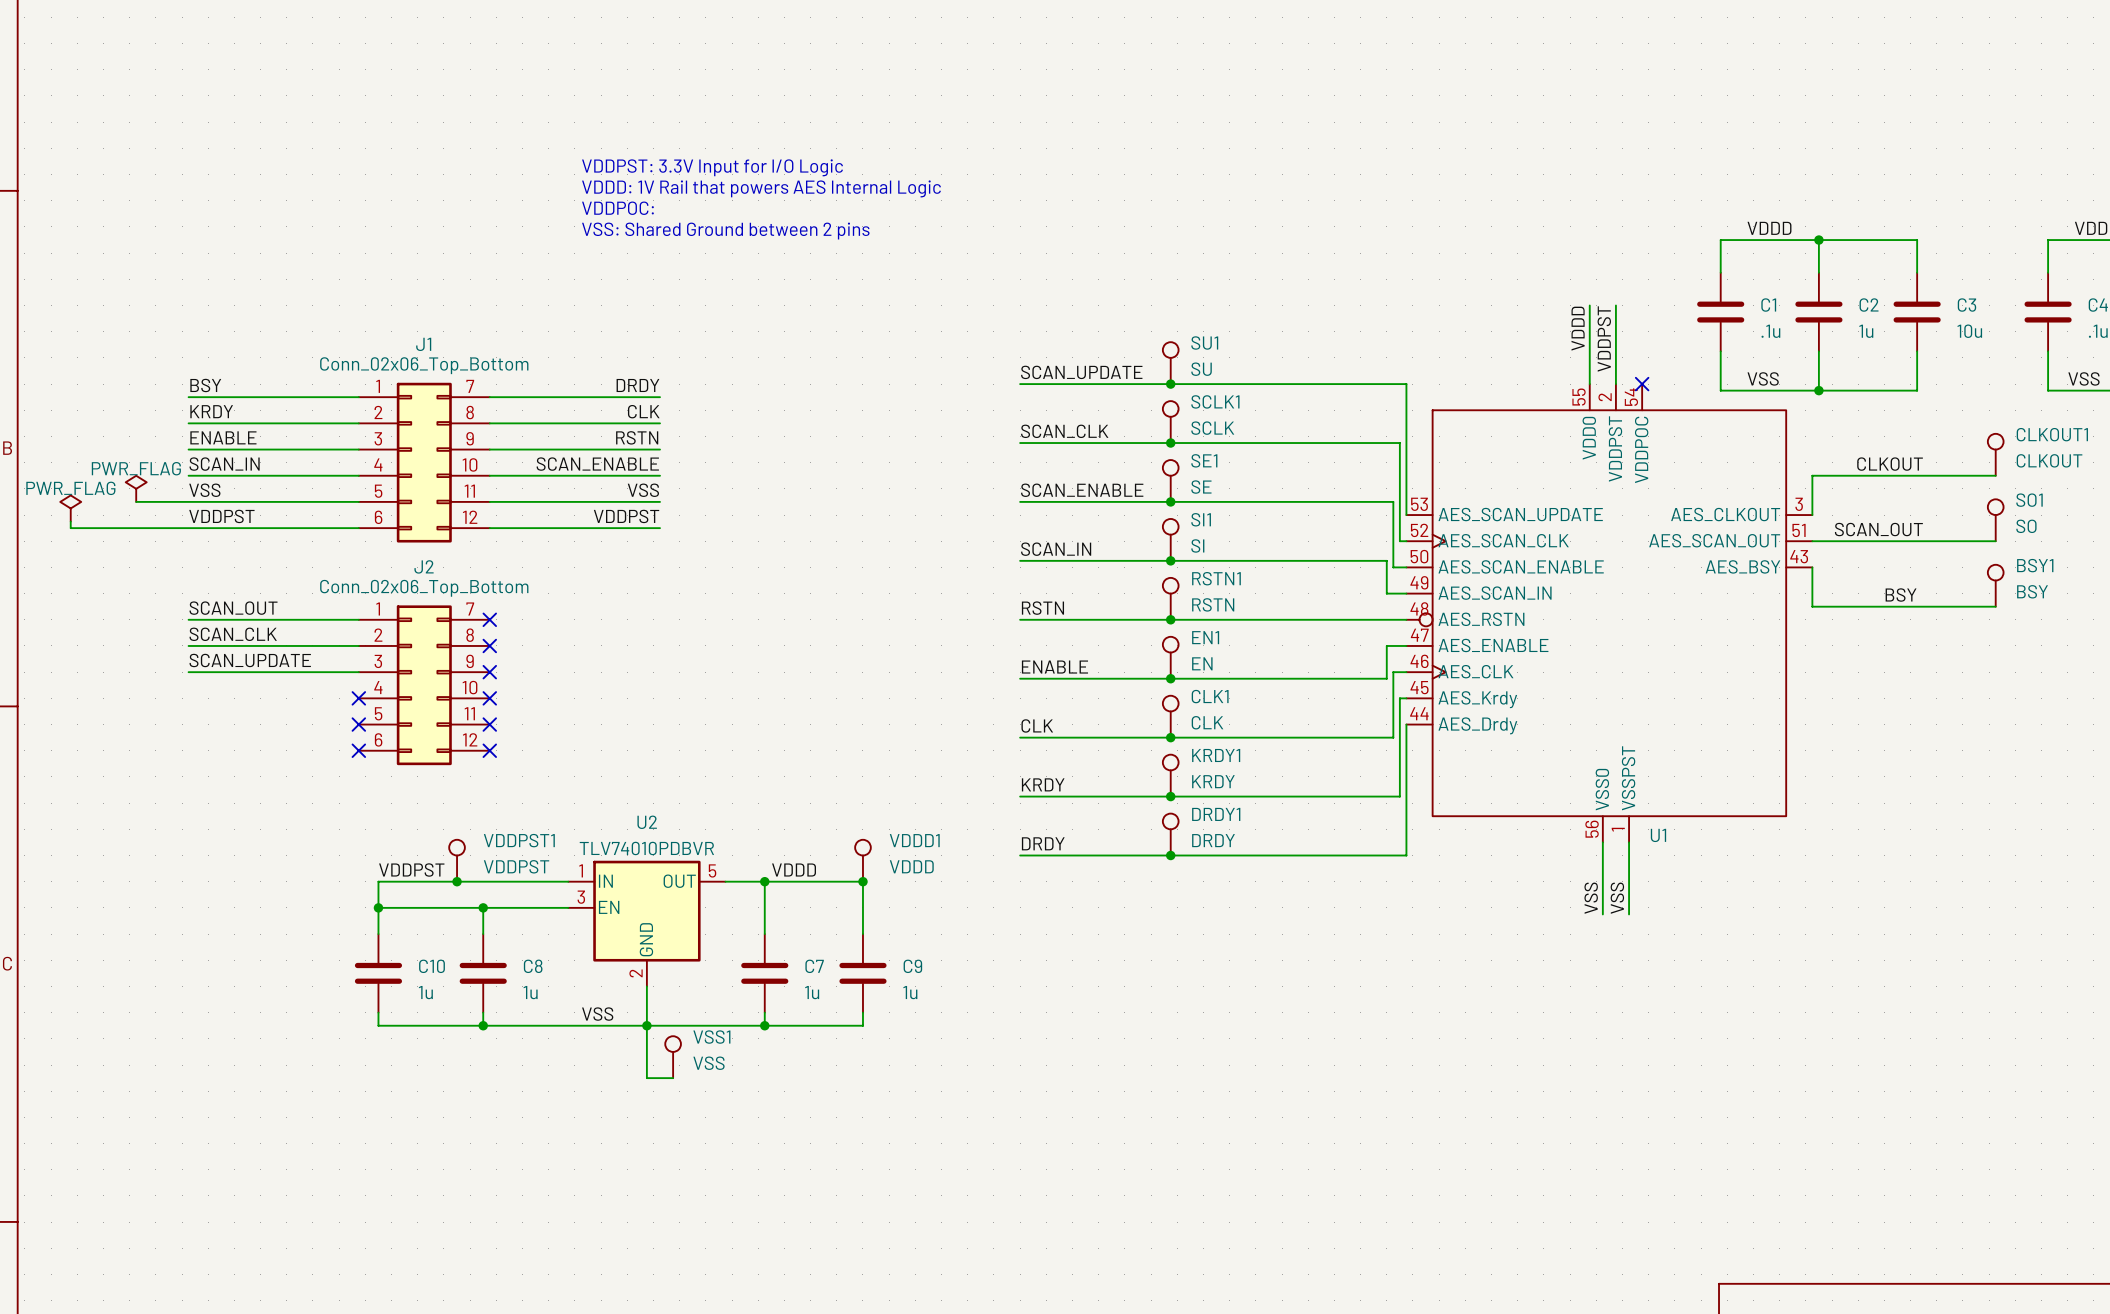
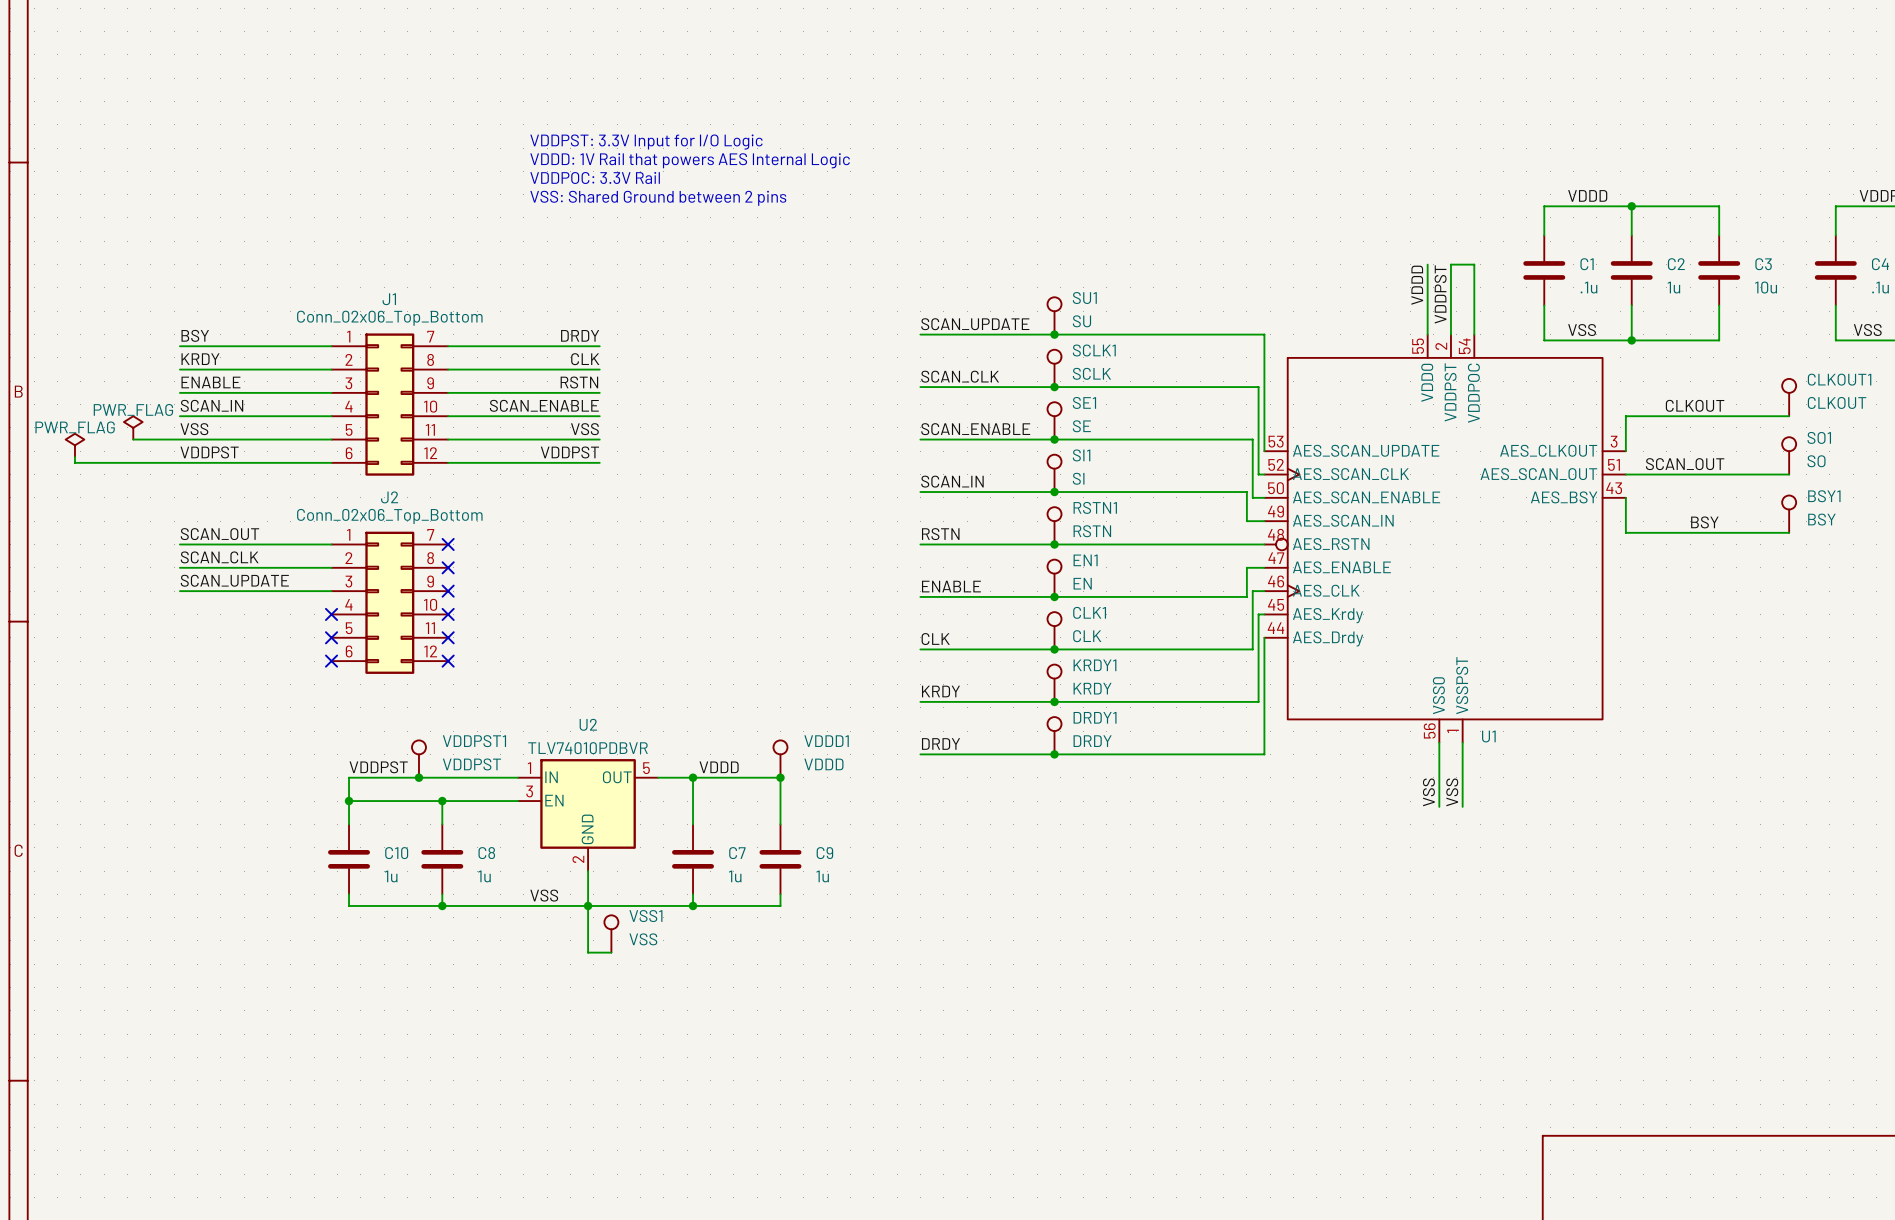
text: VDDPOC: (617, 208) -> VDDPOC: 3.3V Rail (595, 177)
wire: none -> (1450, 264) (1474, 264) (1474, 334)
no-connect mark: (1642, 384) -> none

